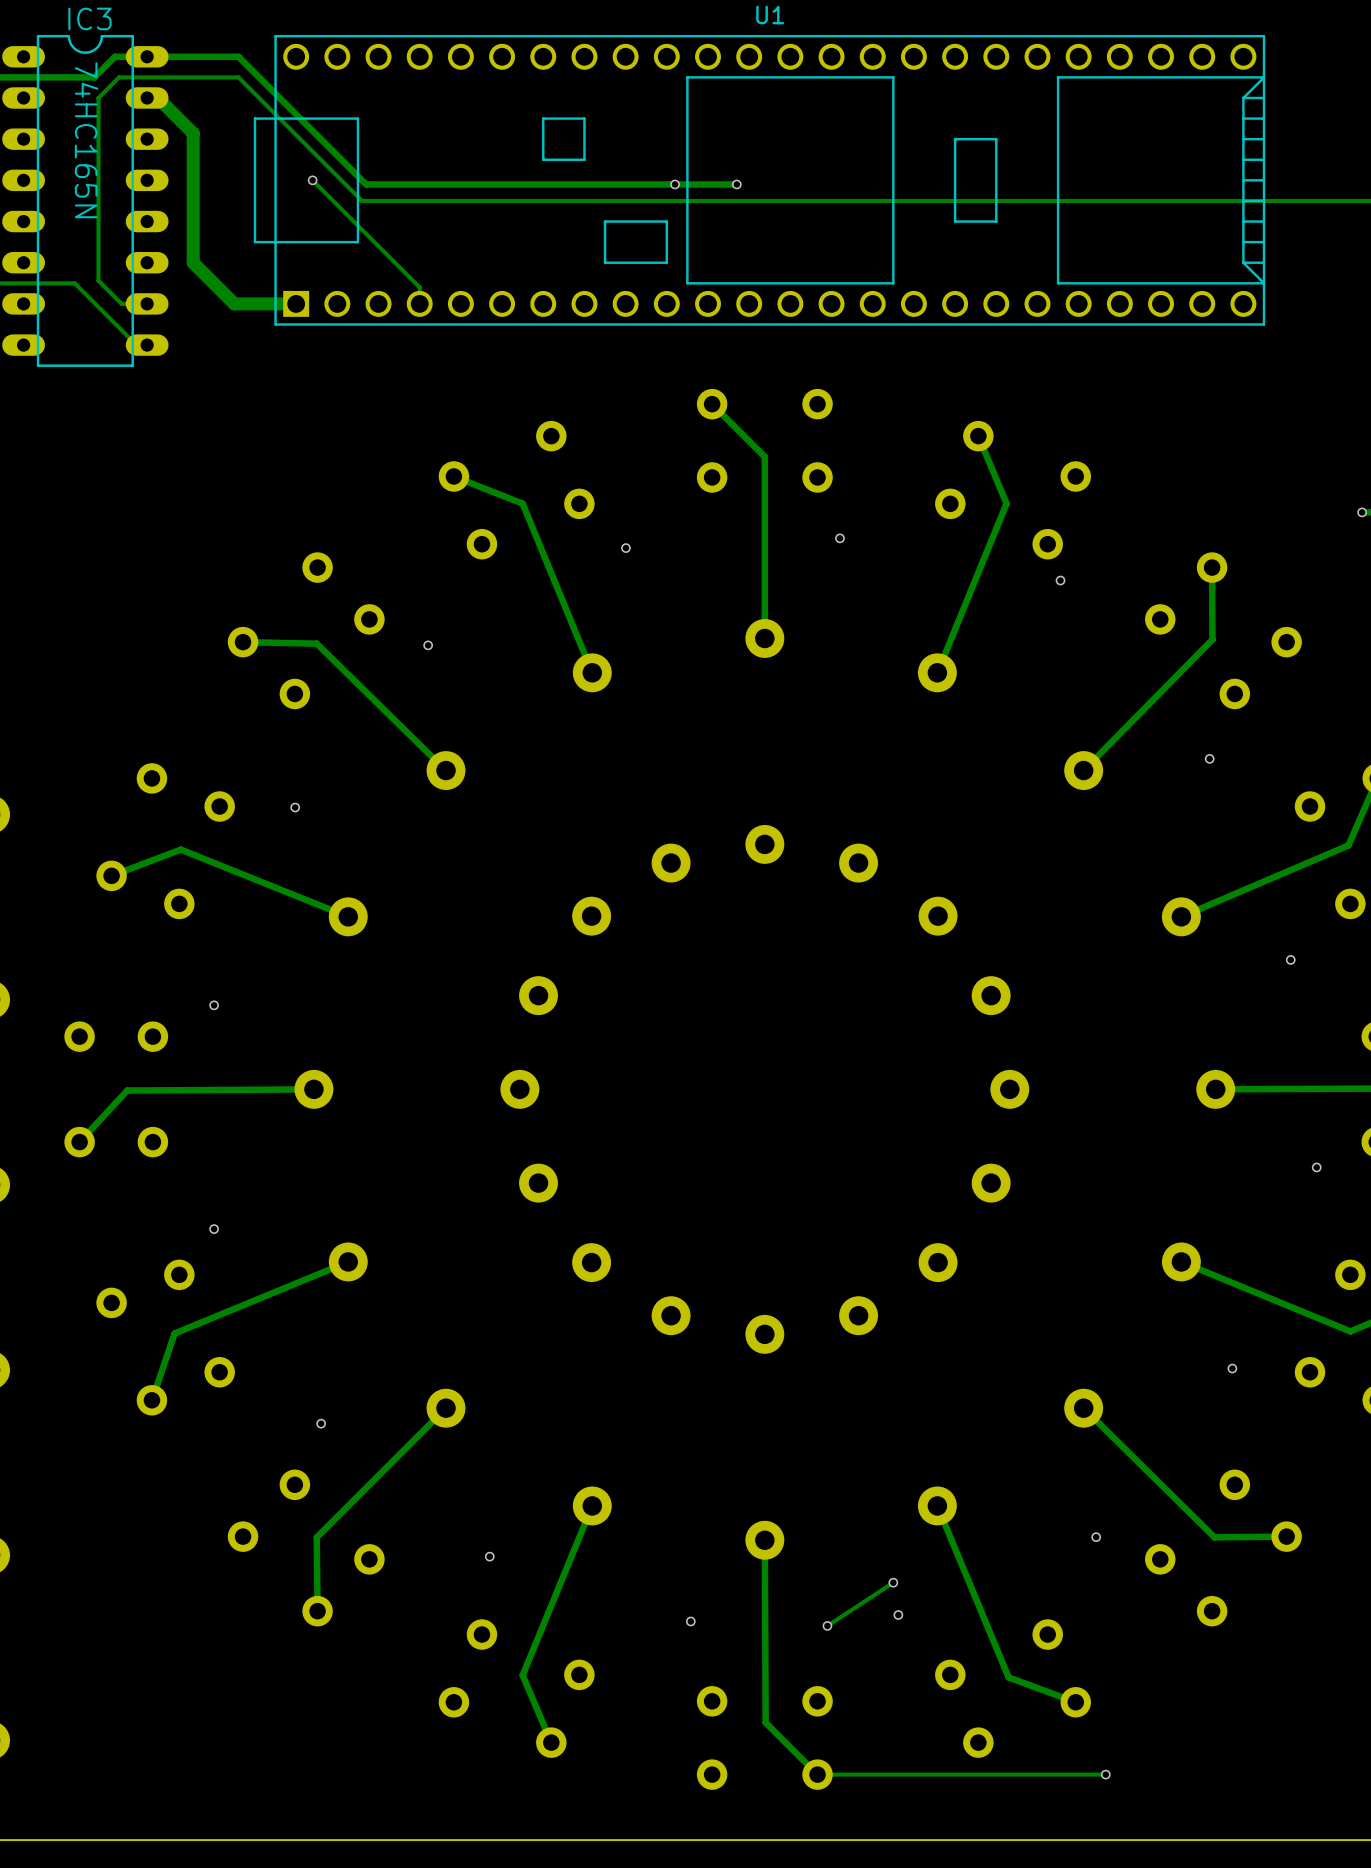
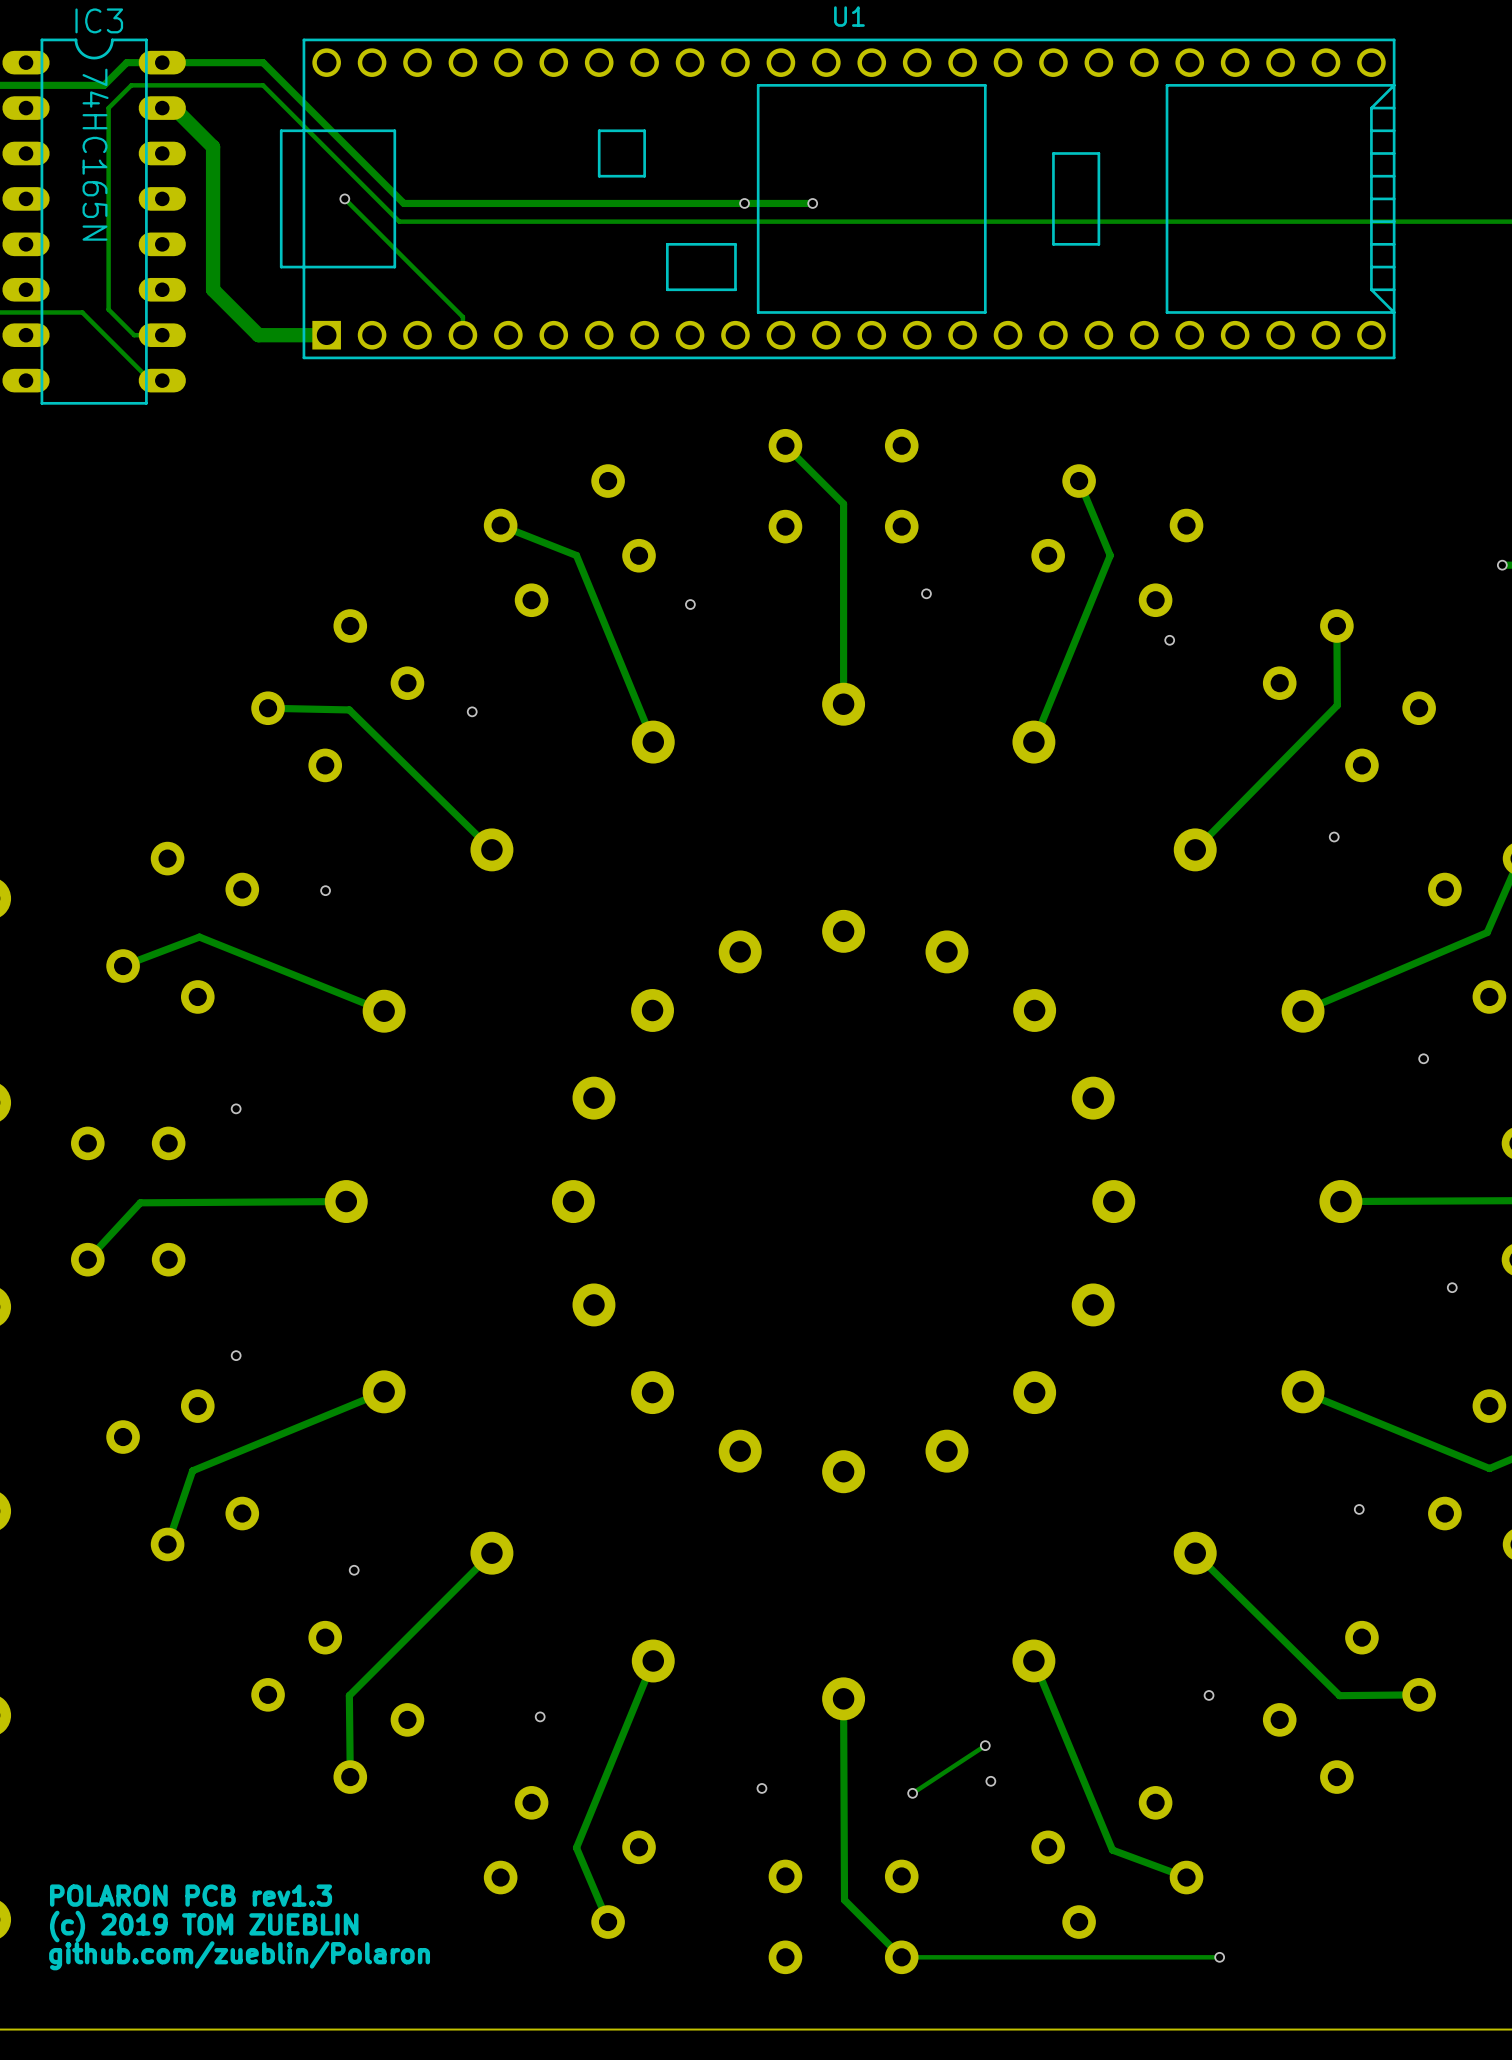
text: none -> POLARON PCB rev1.3 (191, 1895)
text: none -> (c) 2019 TOM ZUEBLIN (204, 1926)
text: none -> github.com/zueblin/Polaron (239, 1955)

